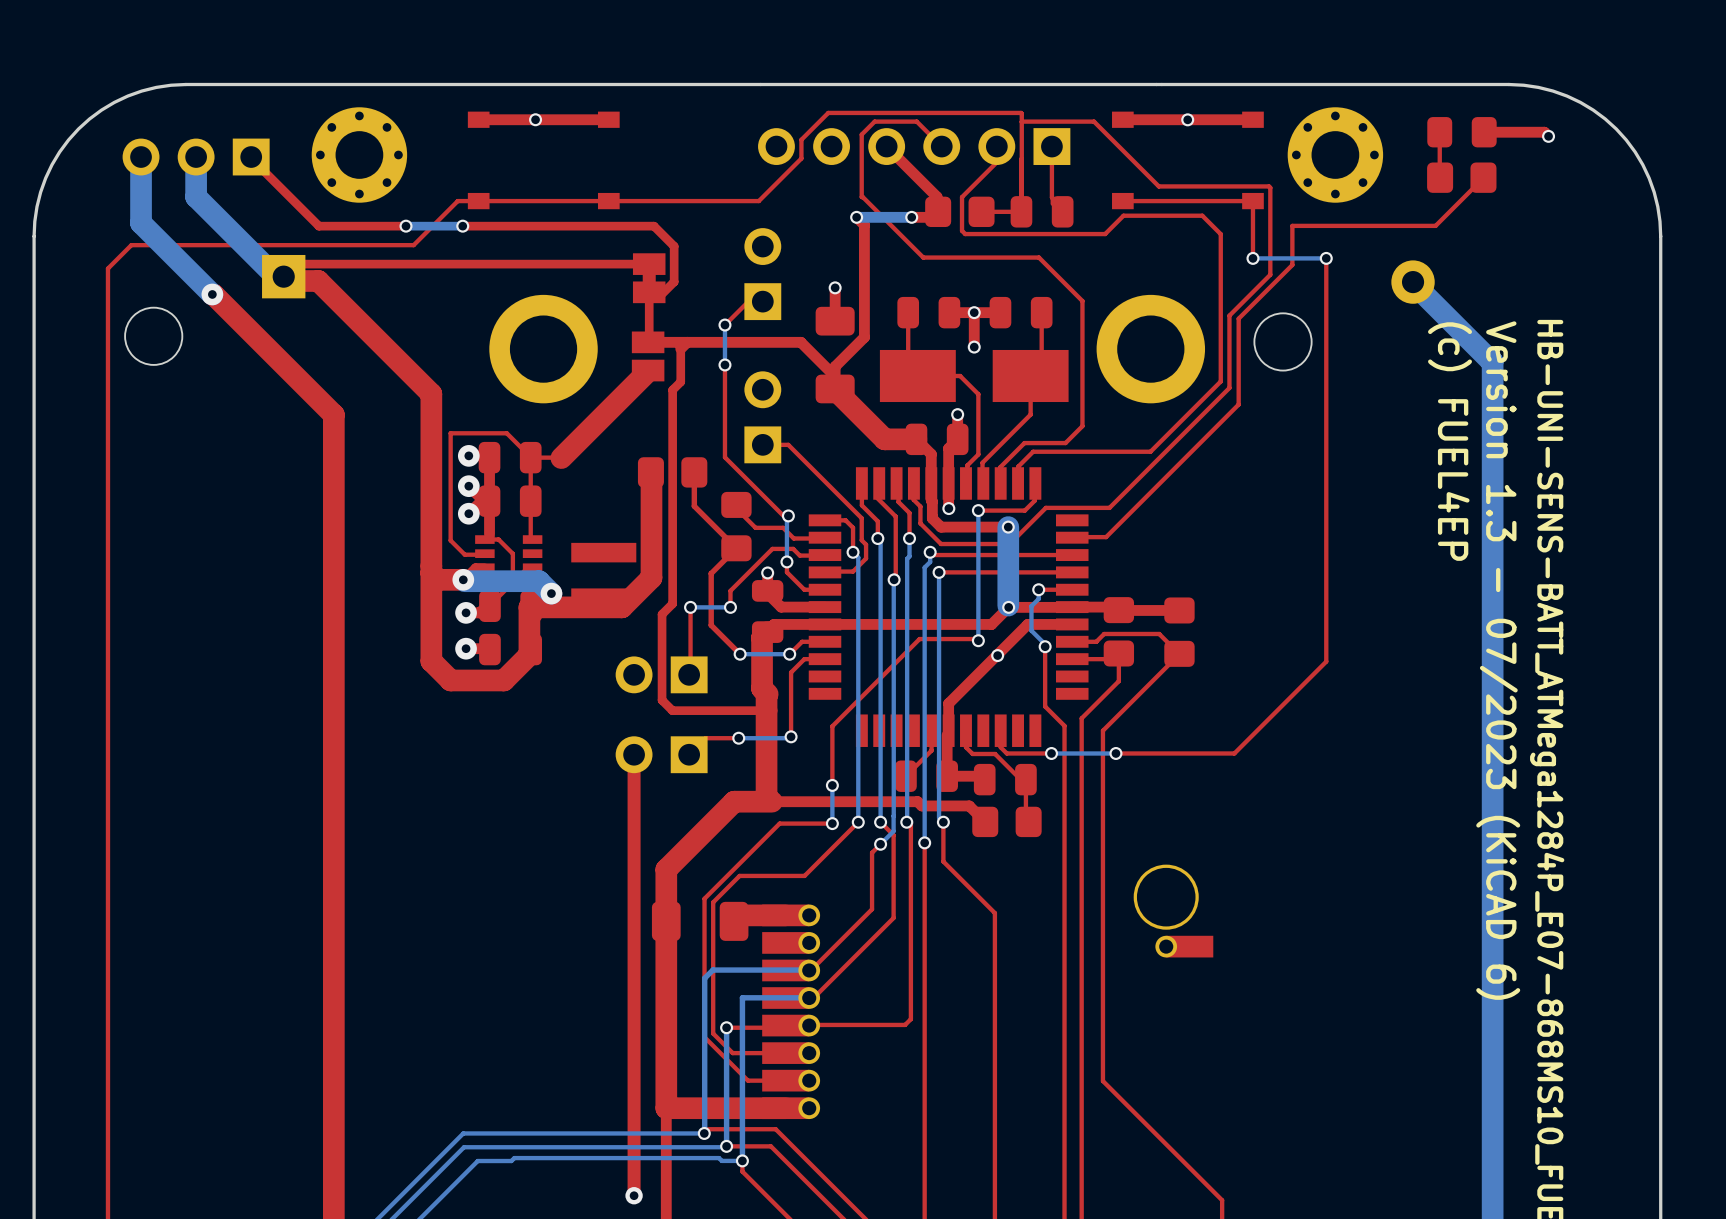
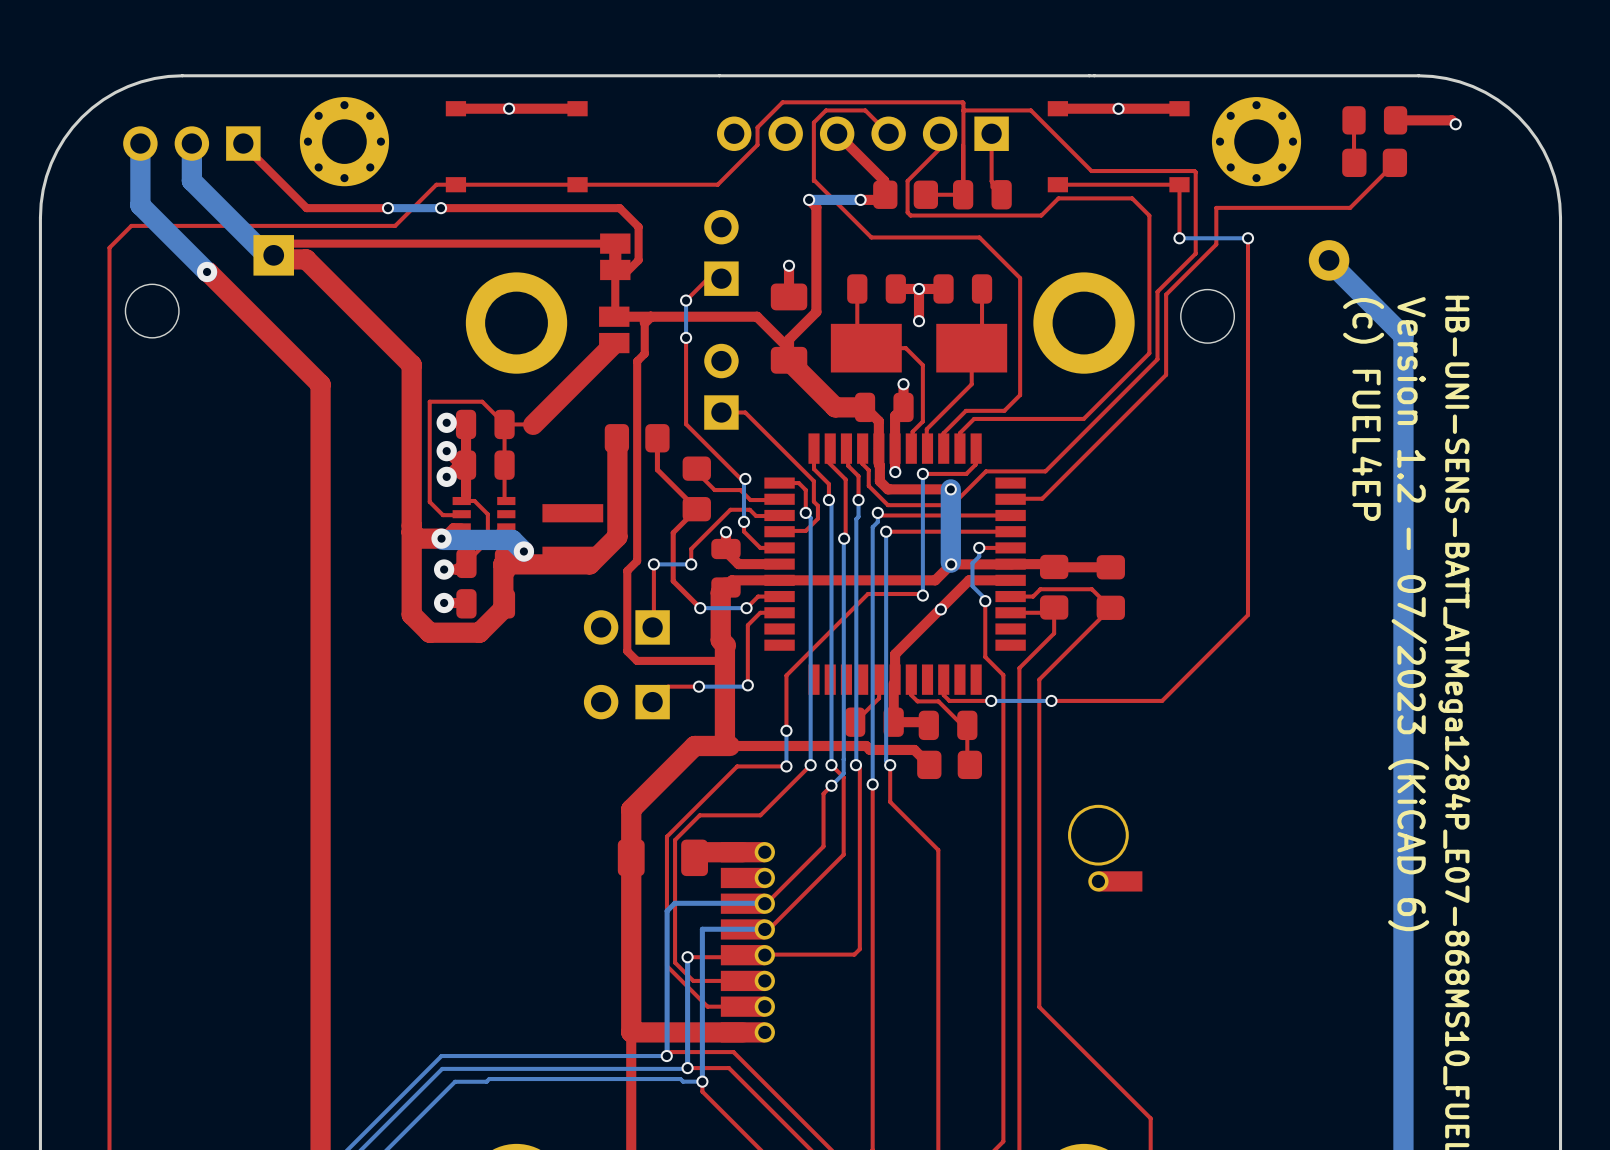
text: Version 1.3 - 07/2023 (KiCAD 6) (1498, 660) -> Version 1.2 - 07/2023 (KiCAD 6) (1408, 614)
top track: (634, 754) (634, 1195) -> none
via: (634, 1195) -> none

